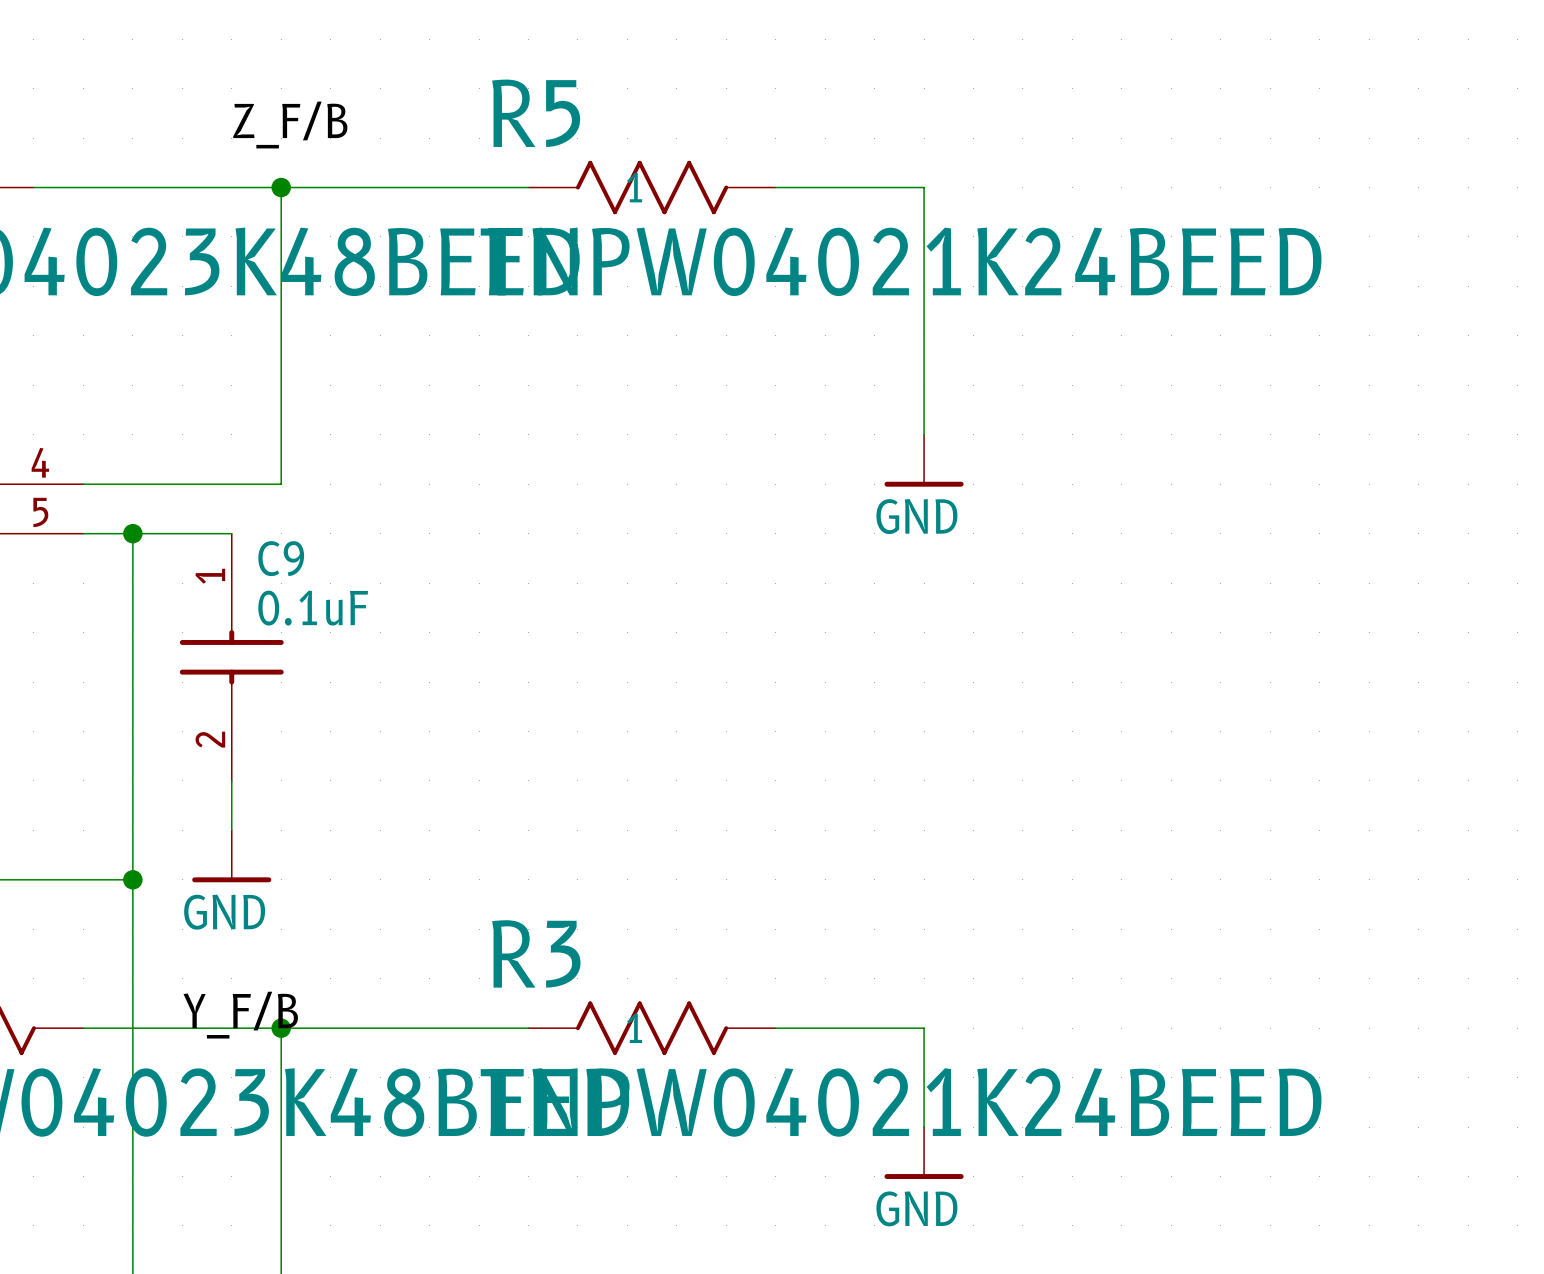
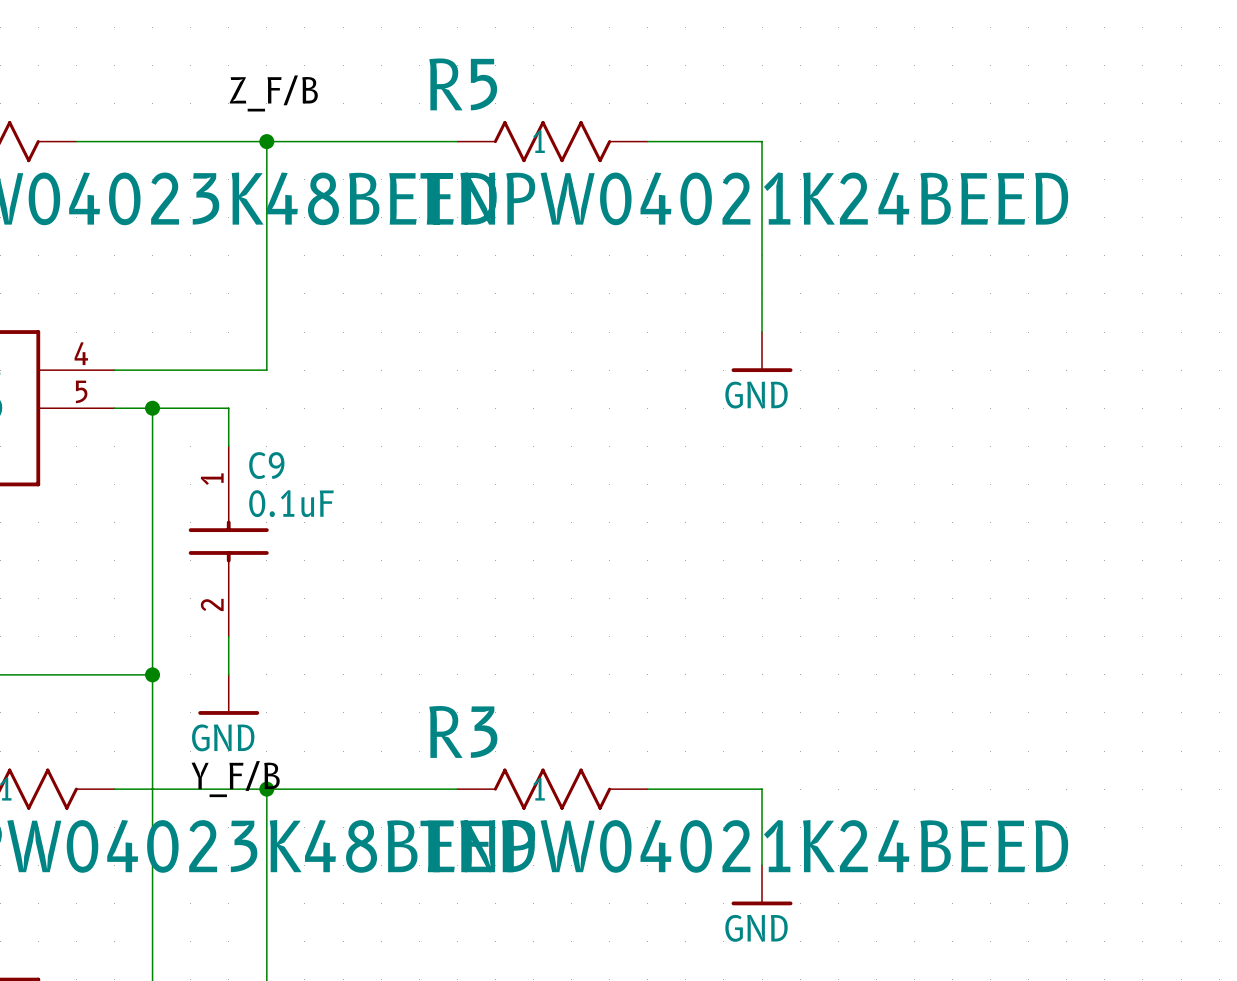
C9 position: (231, 657) -> (228, 541)
power symbol position: GND (231, 856) -> GND (228, 694)

